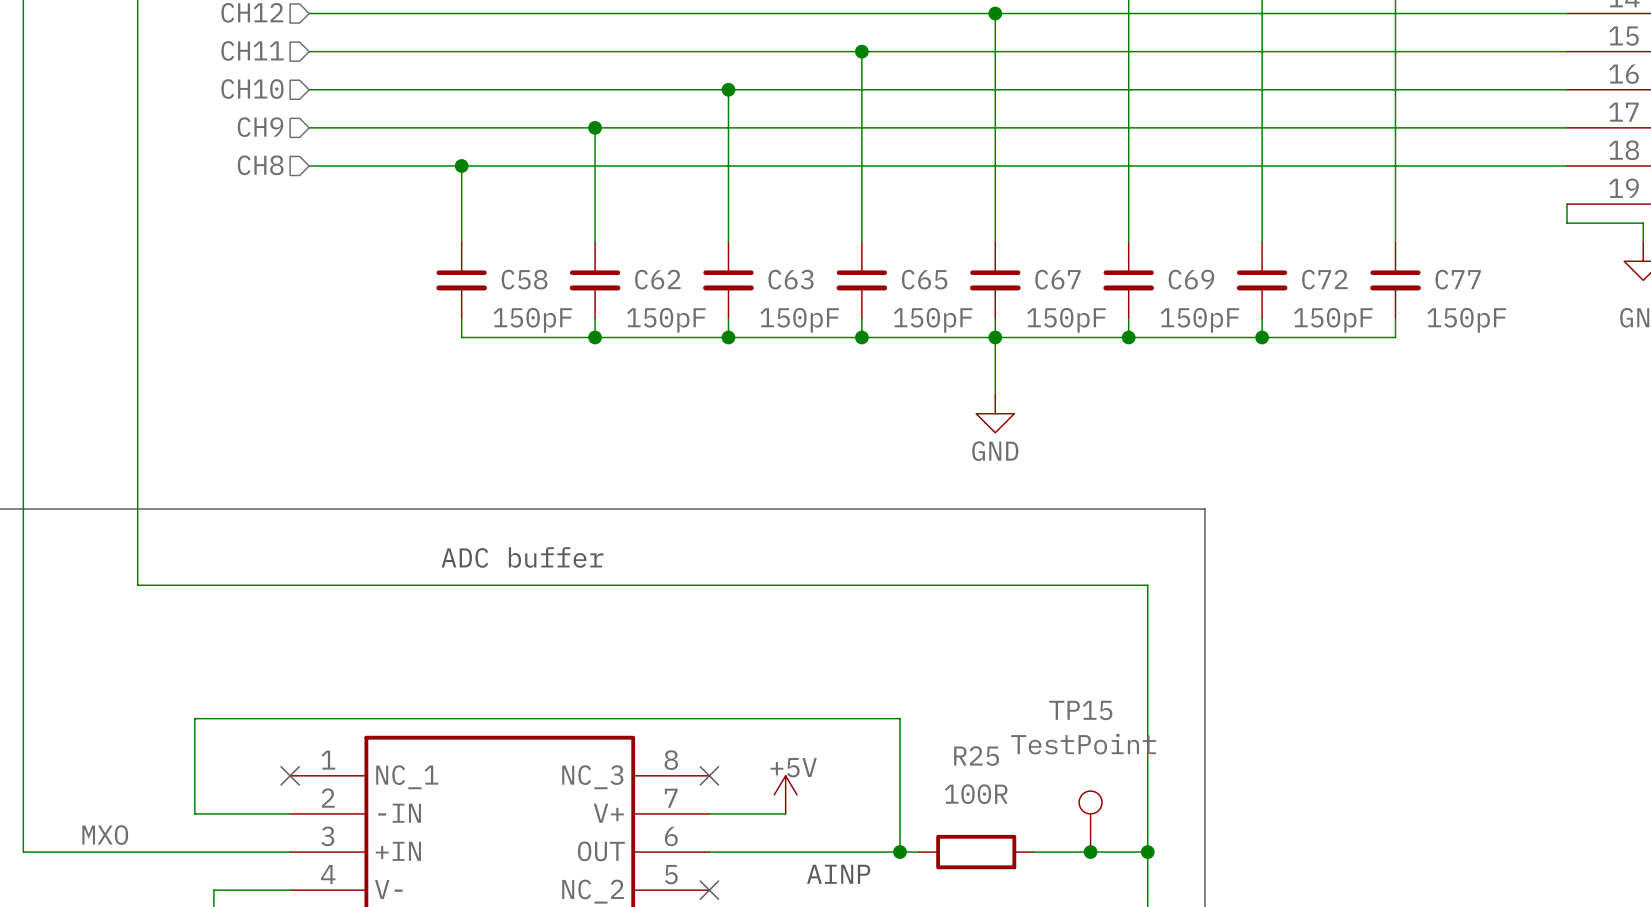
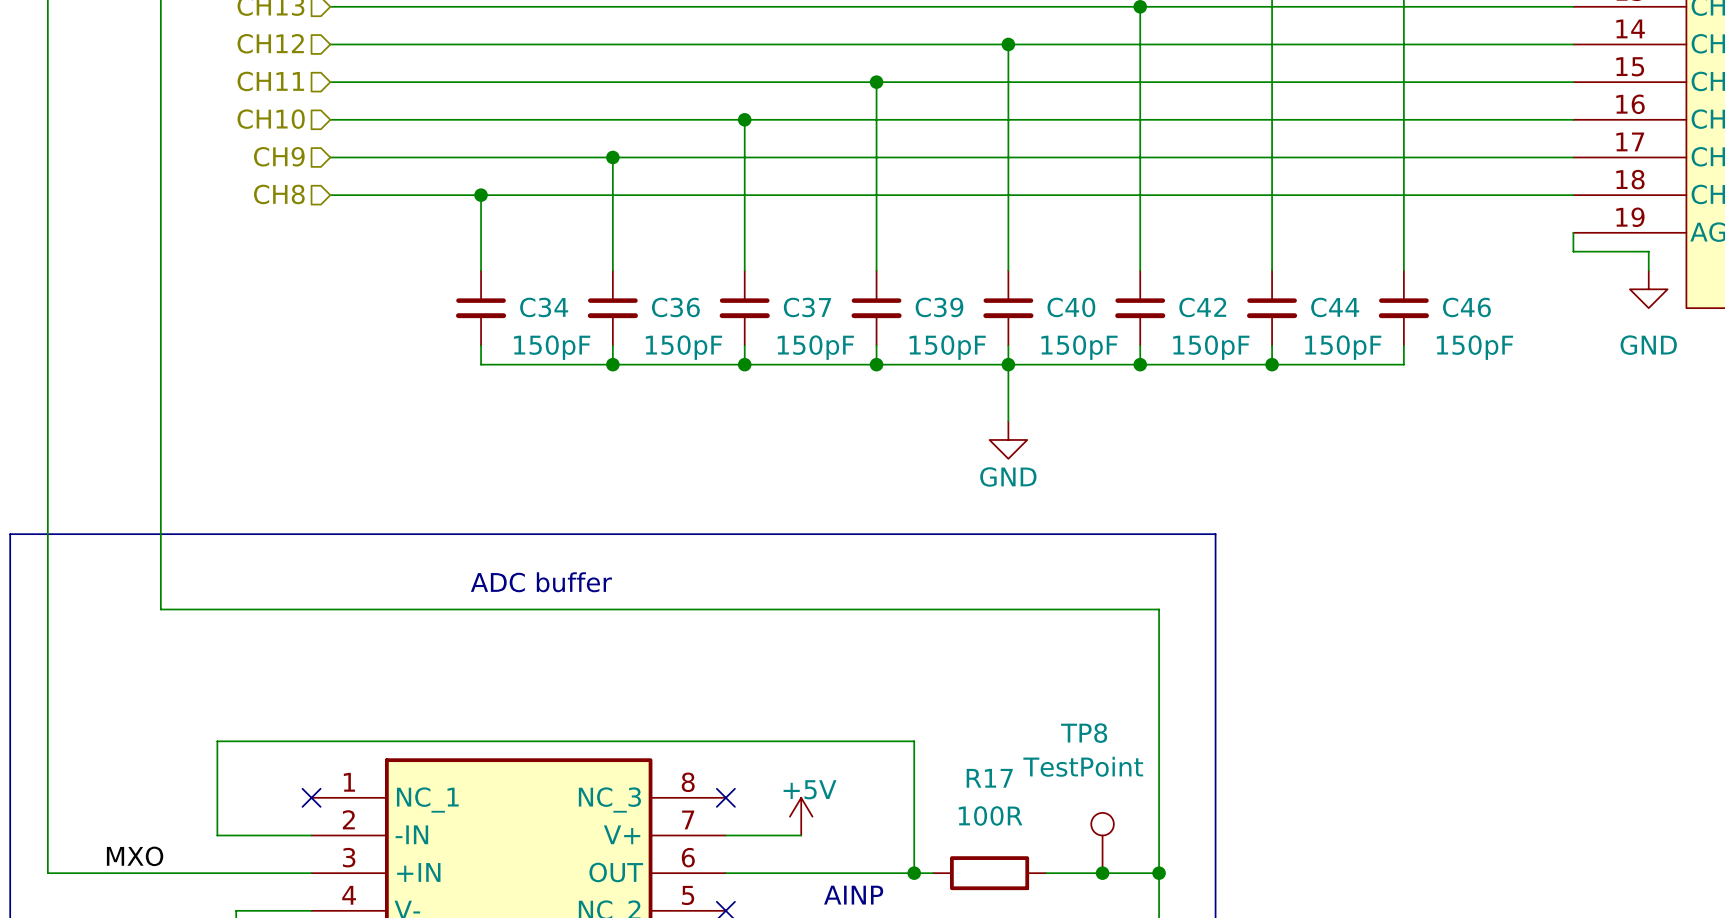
C58 name: C58 (524, 279) -> C34 (544, 307)
C62 name: C62 (657, 279) -> C36 (675, 307)
C63 name: C63 (791, 279) -> C37 (807, 307)
C65 name: C65 (924, 279) -> C39 (939, 307)
C67 name: C67 (1057, 279) -> C40 (1071, 307)
C69 name: C69 (1191, 279) -> C42 (1202, 307)
C72 name: C72 (1324, 279) -> C44 (1335, 307)
C77 name: C77 (1458, 279) -> C46 (1466, 307)
TP15 name: TP15 (1080, 710) -> TP8 (1084, 733)
R25 name: R25 (976, 756) -> R17 (989, 778)

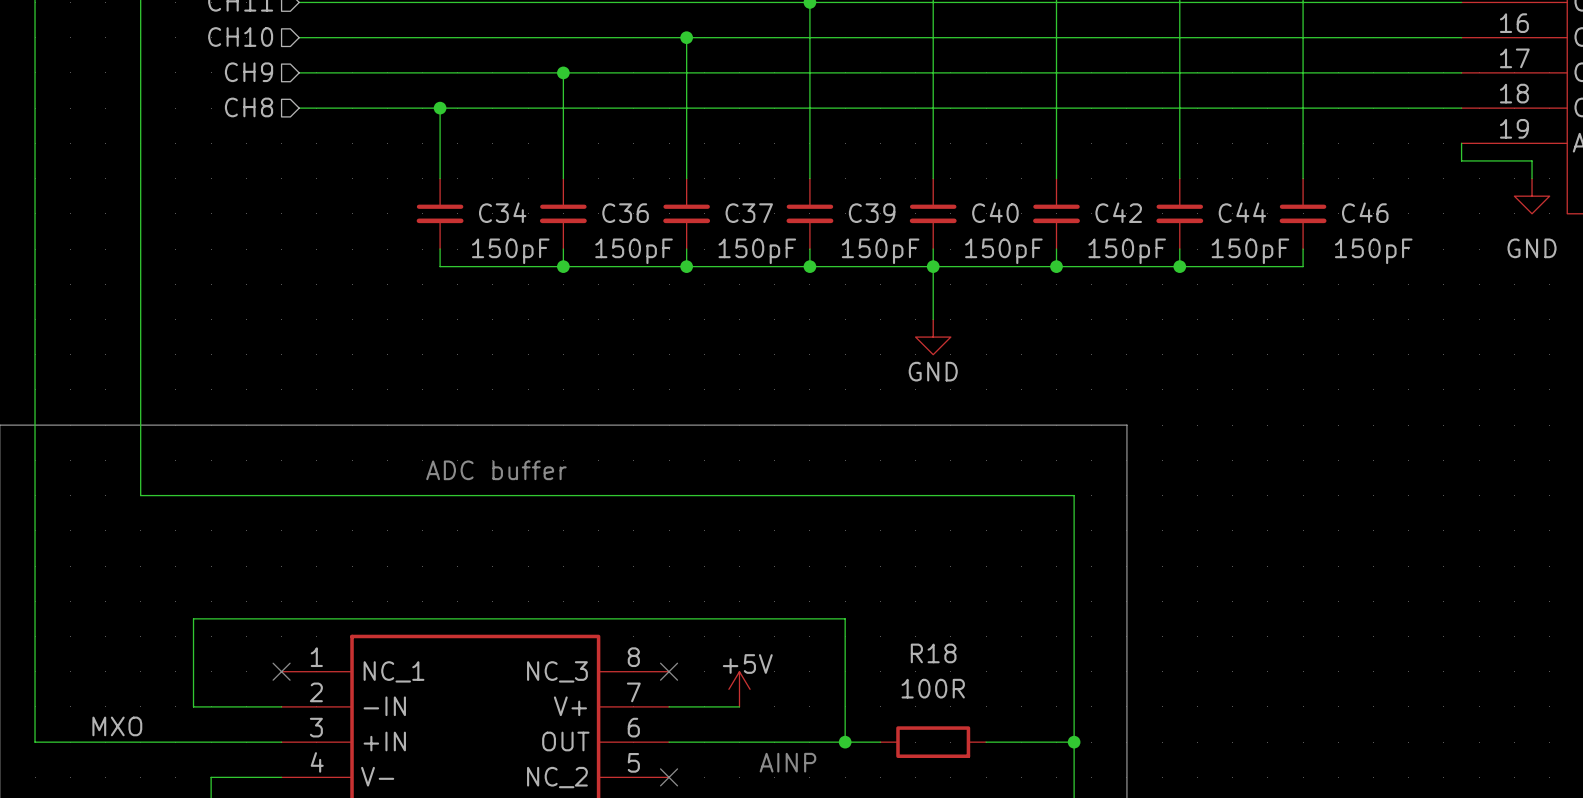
TP8: TestPoint (1102, 843) -> none
R17: 100R (989, 873) -> none
R18: none -> 100R (933, 742)
junction: (1102, 873) -> none

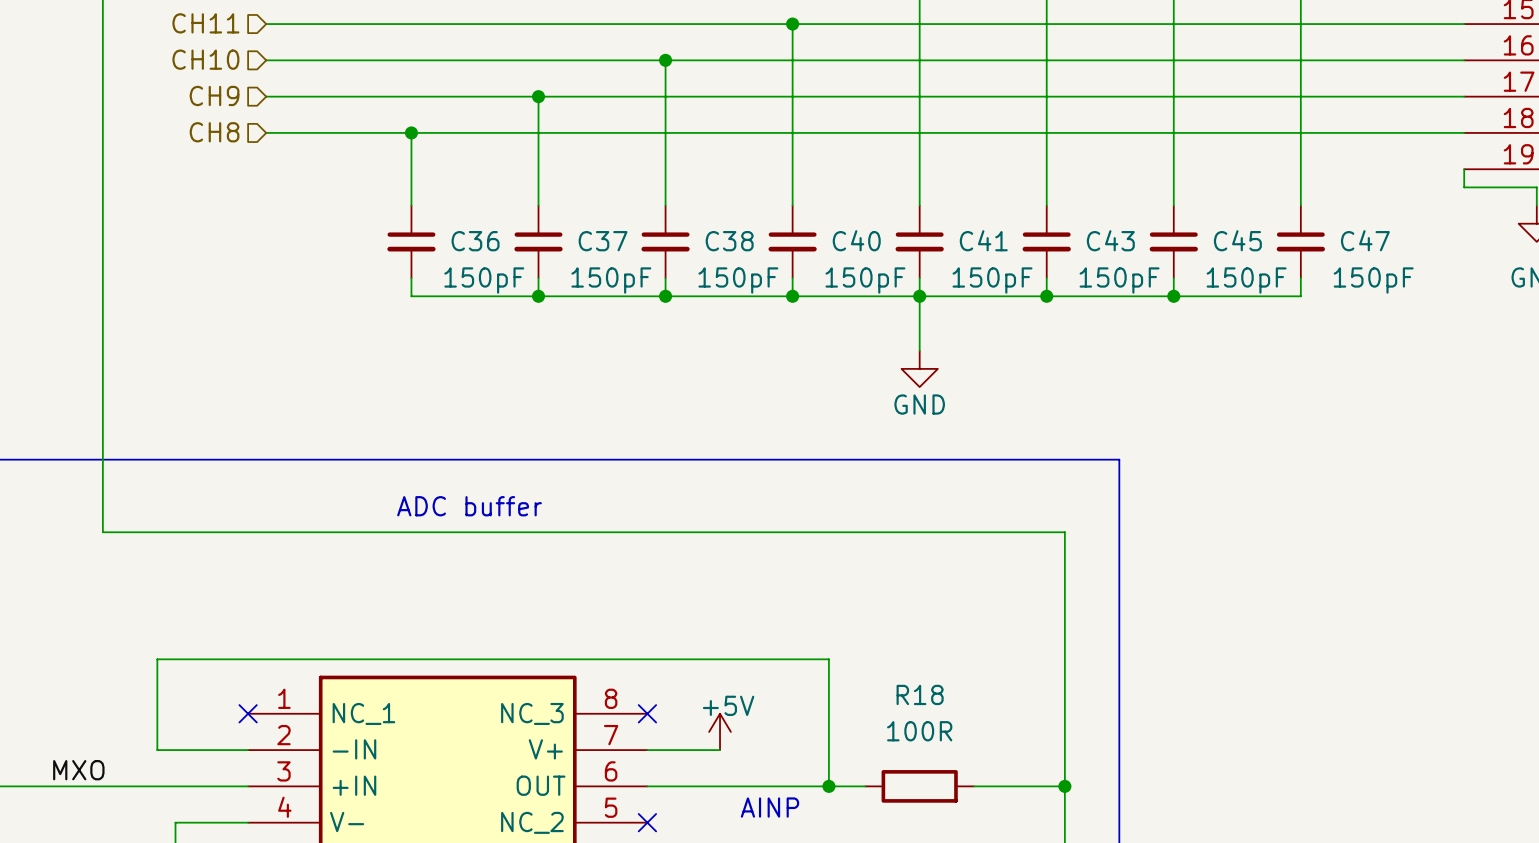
C34 name: C34 (502, 212) -> C36 (475, 241)
C40 name: C40 (995, 212) -> C41 (983, 240)
C42 name: C42 (1118, 212) -> C43 (1110, 240)
C44 name: C44 (1242, 212) -> C45 (1237, 240)
C46 name: C46 (1365, 212) -> C47 (1365, 240)
C36 name: C36 (625, 213) -> C37 (603, 241)
C37 name: C37 (749, 213) -> C38 (729, 241)
C39 name: C39 (872, 213) -> C40 (856, 240)

